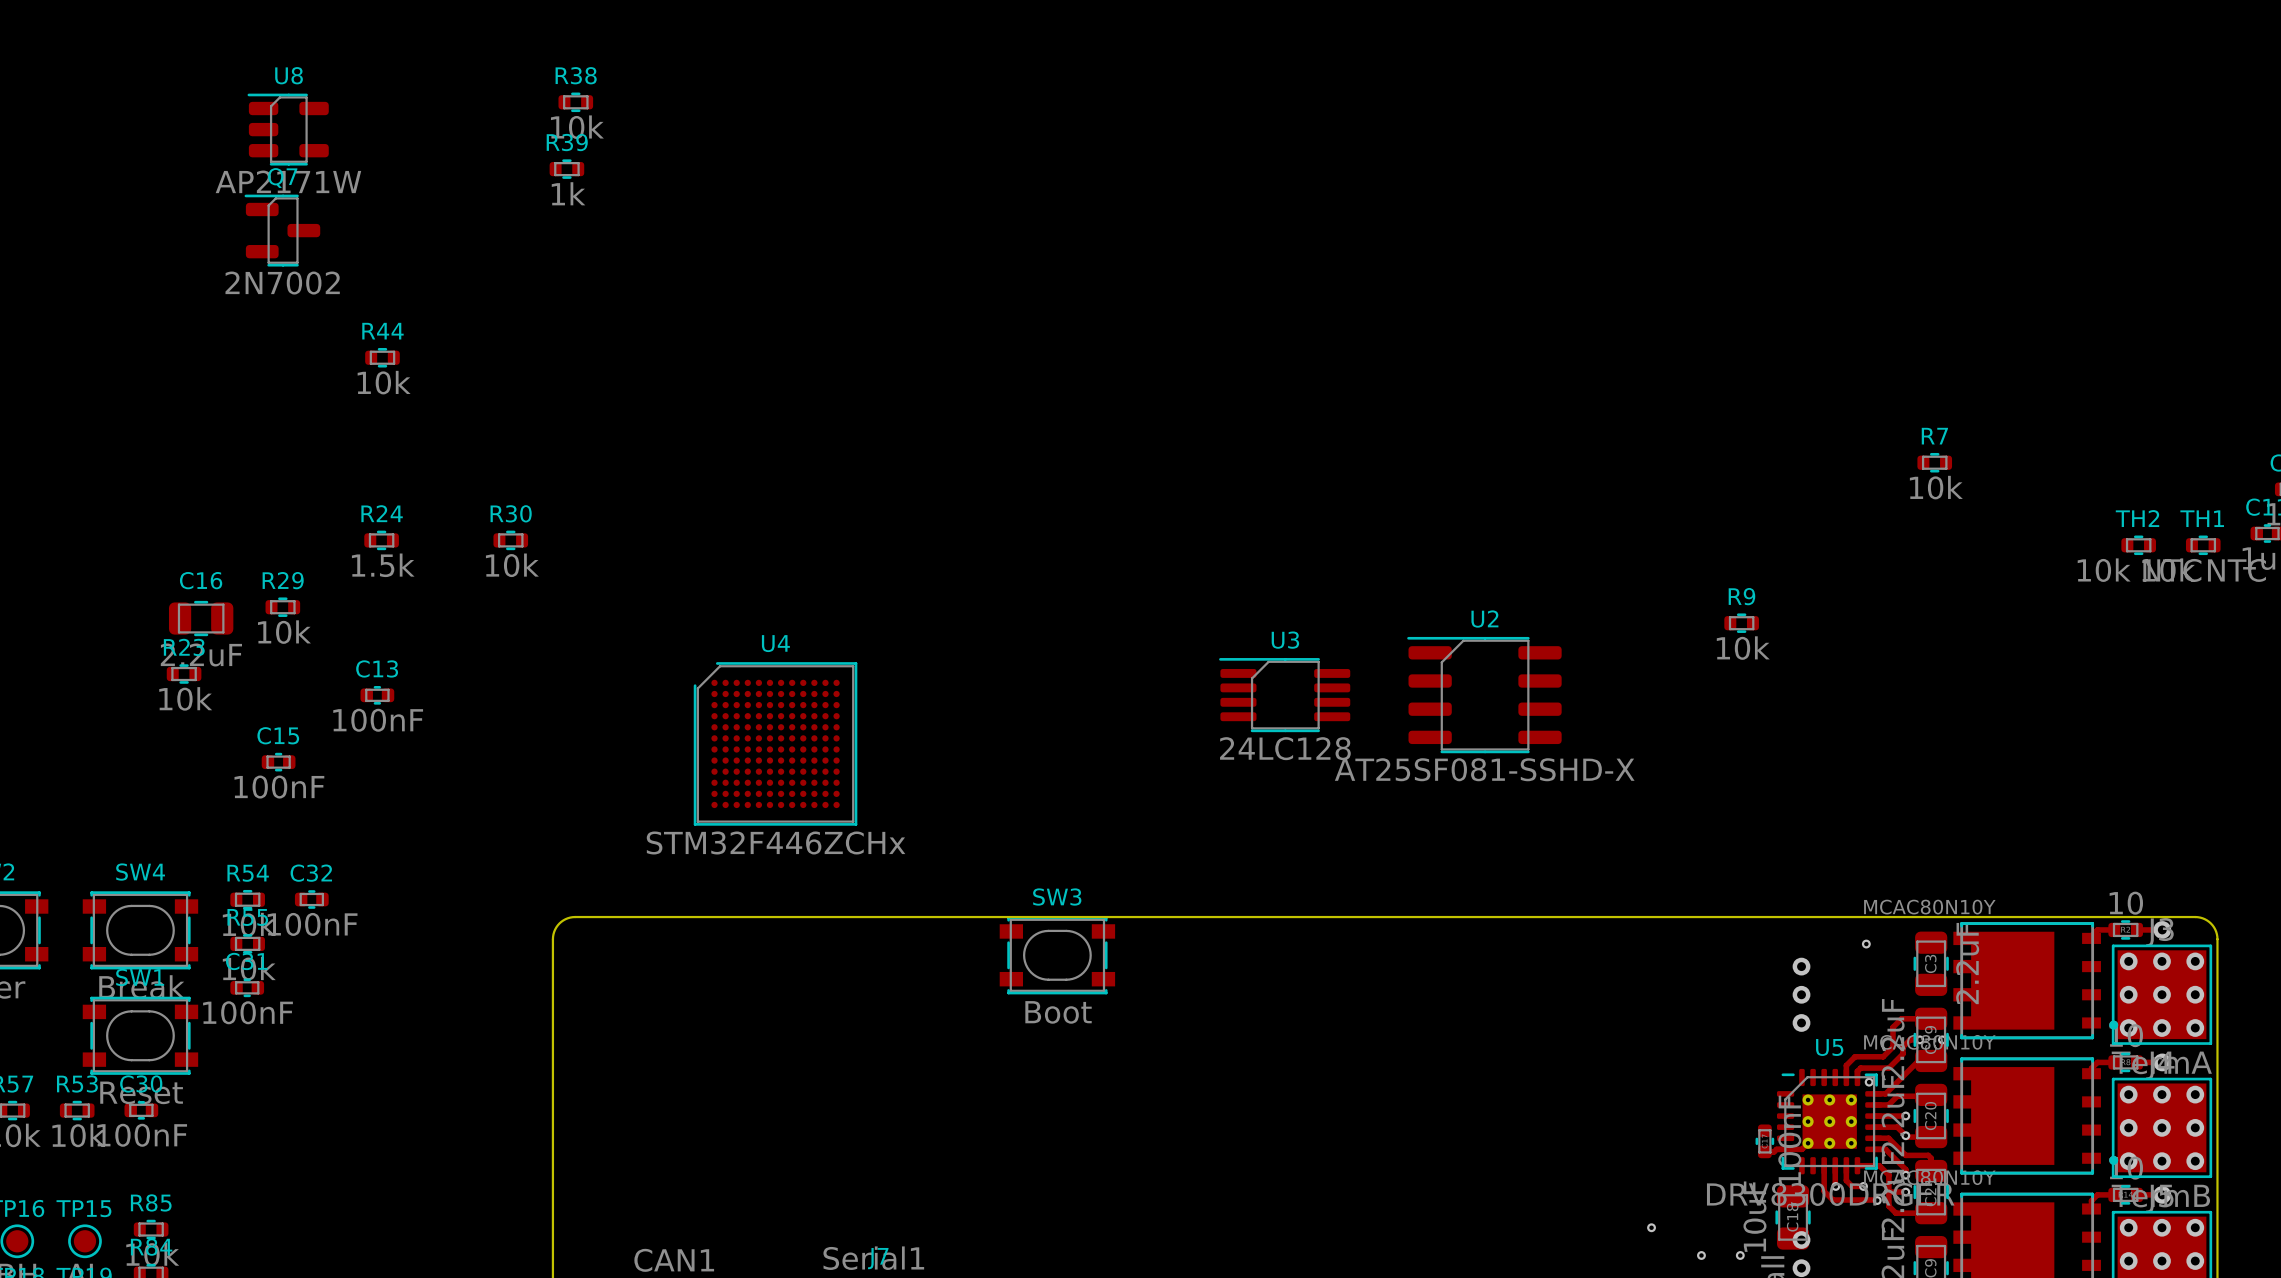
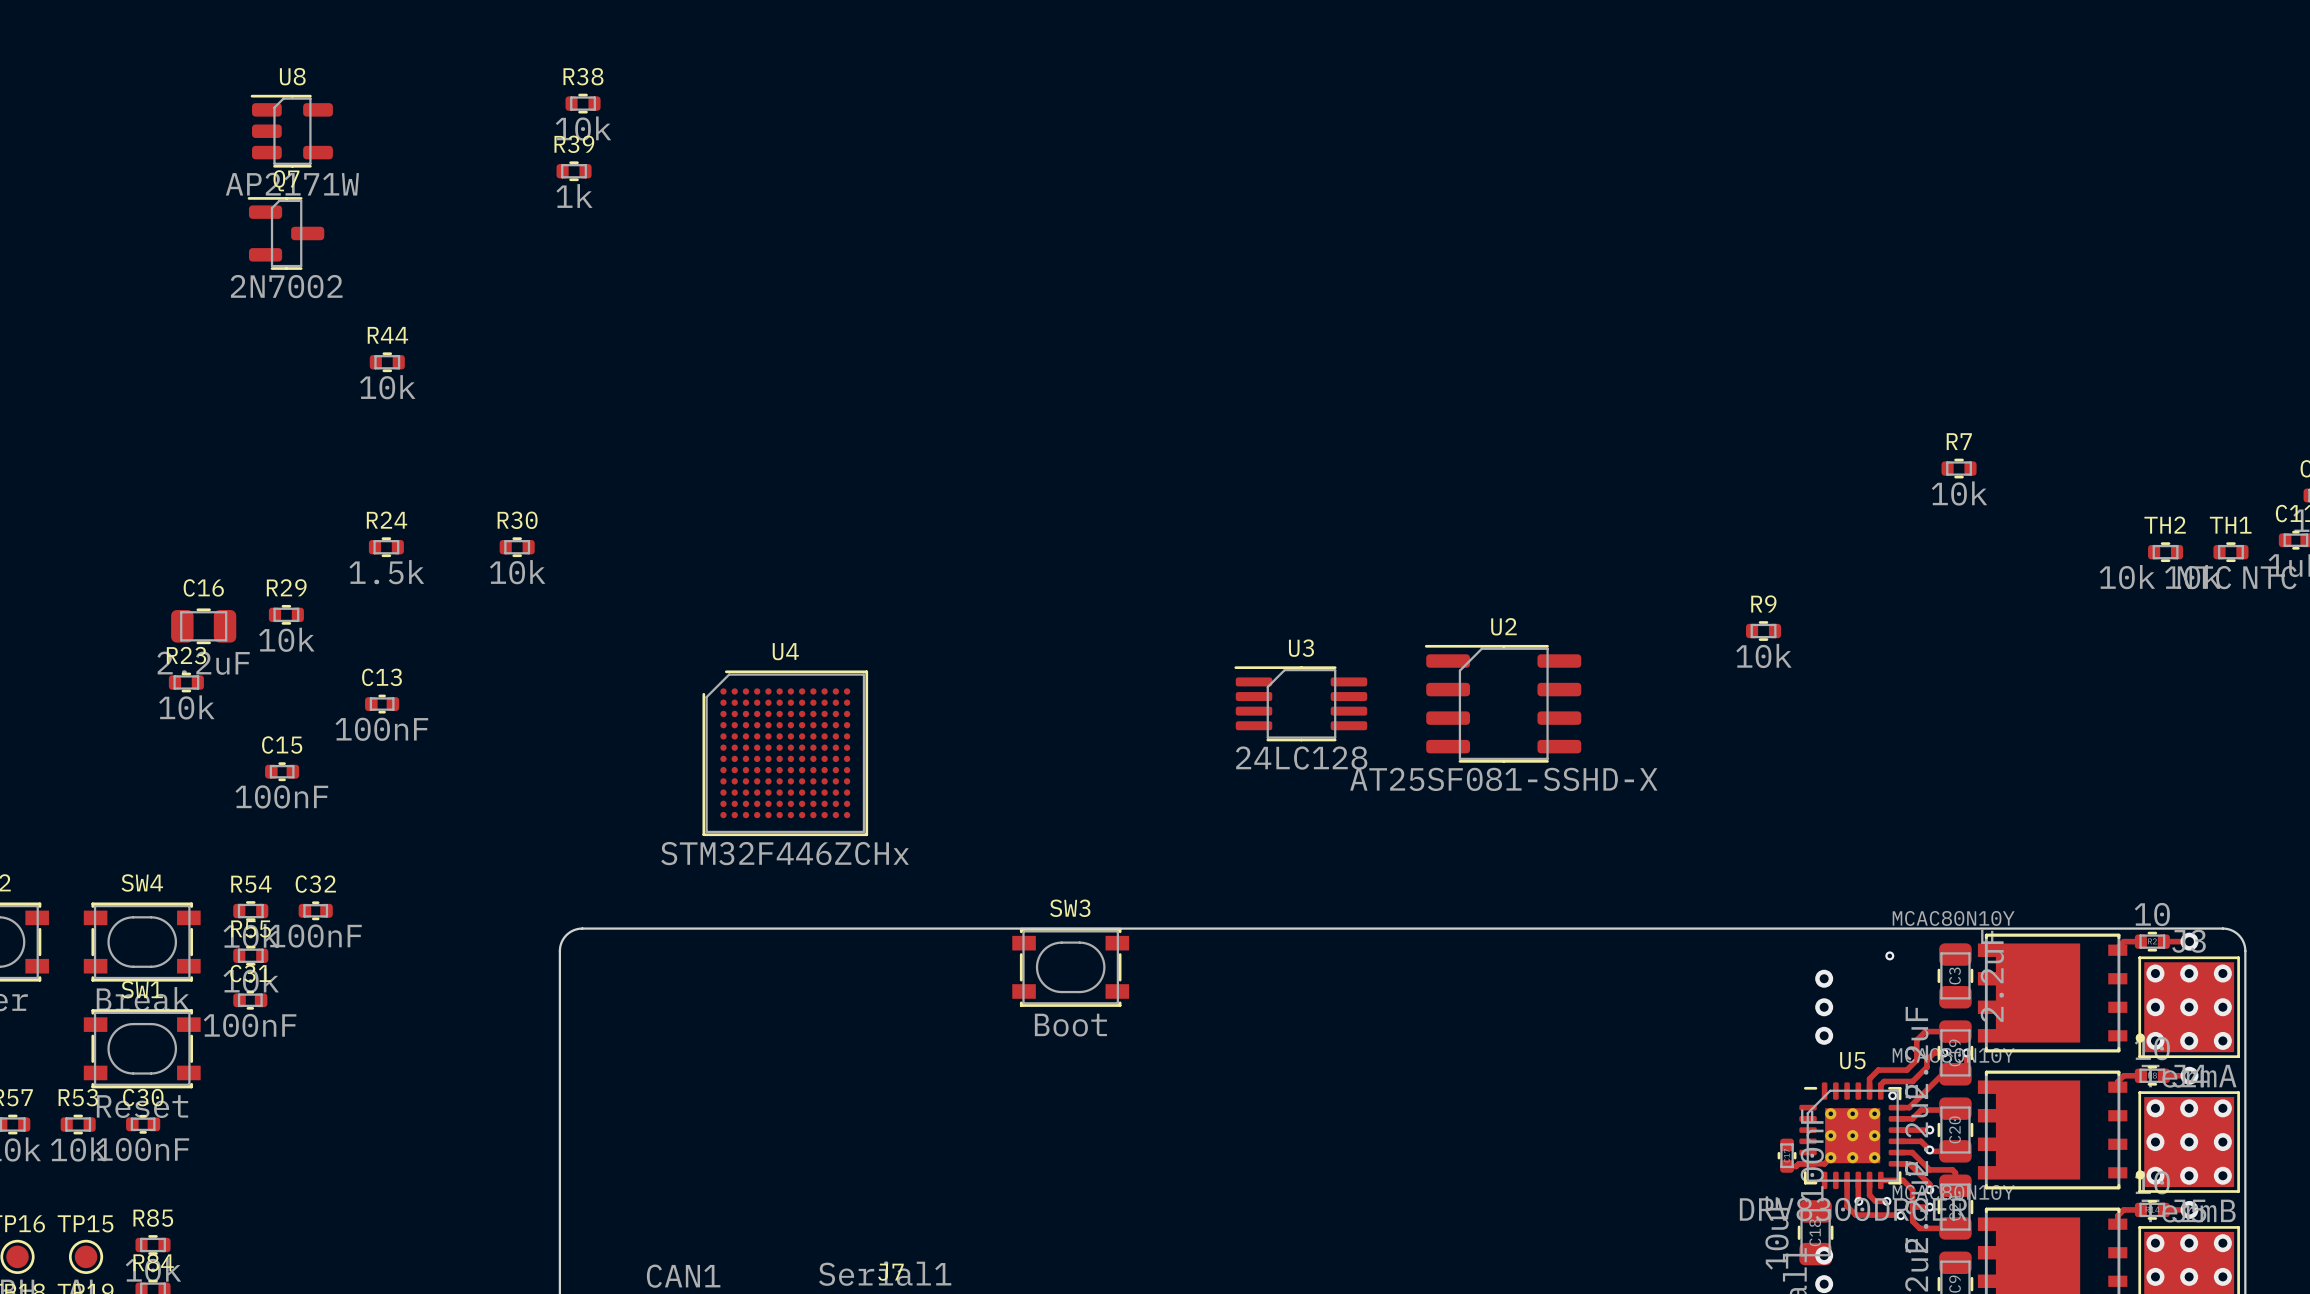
via: (1651, 1227) -> none
via: (1701, 1255) -> none
via: (1740, 1255) -> none

